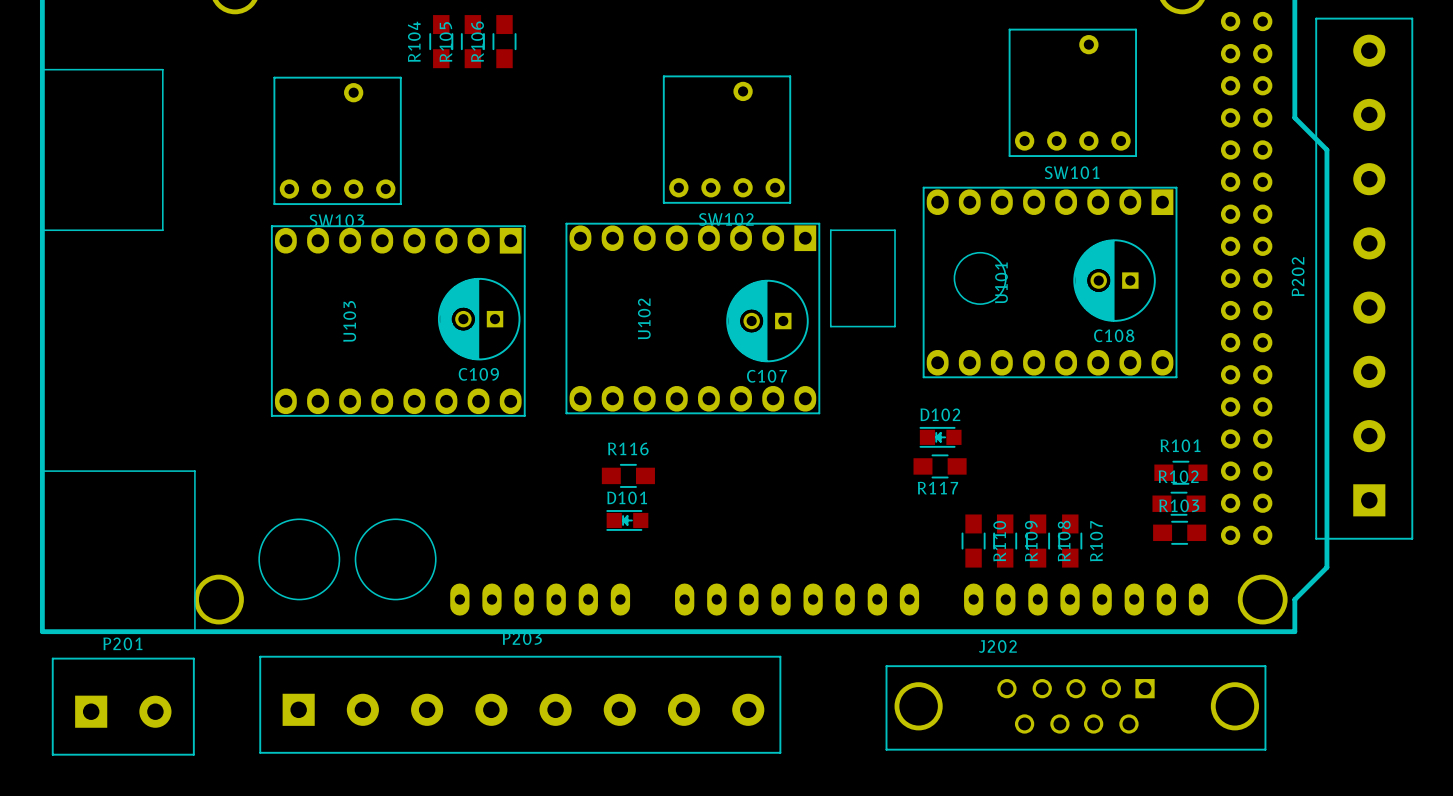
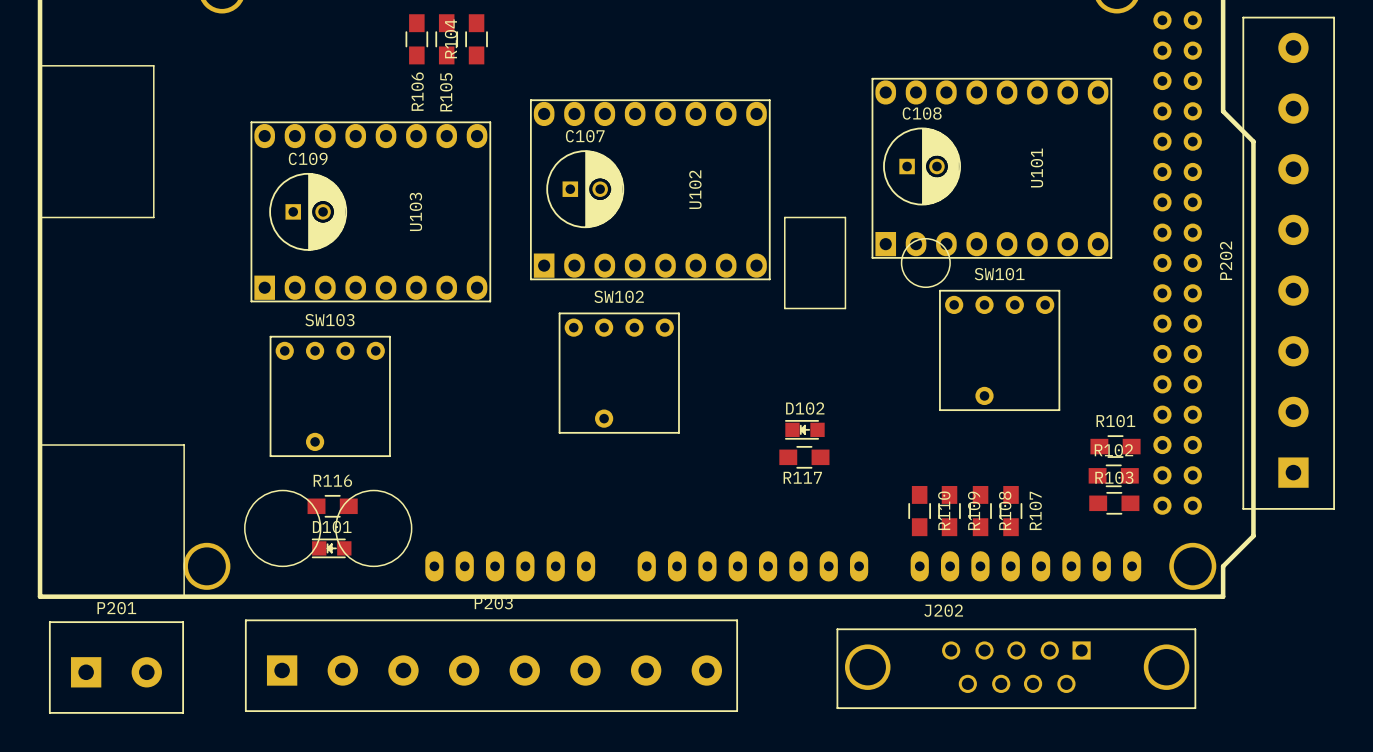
R104 name: R104 (414, 41) -> R106 (417, 91)
R106 name: R106 (477, 41) -> R104 (451, 38)
R105 name position: R105 (445, 42) -> R105 (446, 92)
SW101 rotation: 0° (1072, 92) -> 180° (999, 350)
SW101 position: (1072, 92) -> (999, 350)
SW102 rotation: 0° (727, 139) -> 180° (619, 373)
SW102 position: (727, 139) -> (619, 373)
SW103 rotation: 0° (337, 140) -> 180° (330, 396)
SW103 position: (337, 140) -> (330, 396)
C108 rotation: 0° (1114, 280) -> 180° (922, 166)
C108 position: (1114, 280) -> (922, 166)
U101 rotation: 0° (1050, 282) -> 180° (991, 168)
U102 rotation: 0° (692, 318) -> 180° (650, 189)
C109 rotation: 0° (479, 319) -> 180° (308, 211)
C109 position: (479, 319) -> (308, 211)
U103 rotation: 0° (398, 321) -> 180° (370, 211)
C107 rotation: 0° (767, 321) -> 180° (585, 189)
C107 position: (767, 321) -> (585, 189)
D102 position: (940, 437) -> (804, 429)
R117 position: (940, 466) -> (804, 457)
R116 position: (628, 475) -> (332, 506)
D101 position: (627, 520) -> (331, 548)

